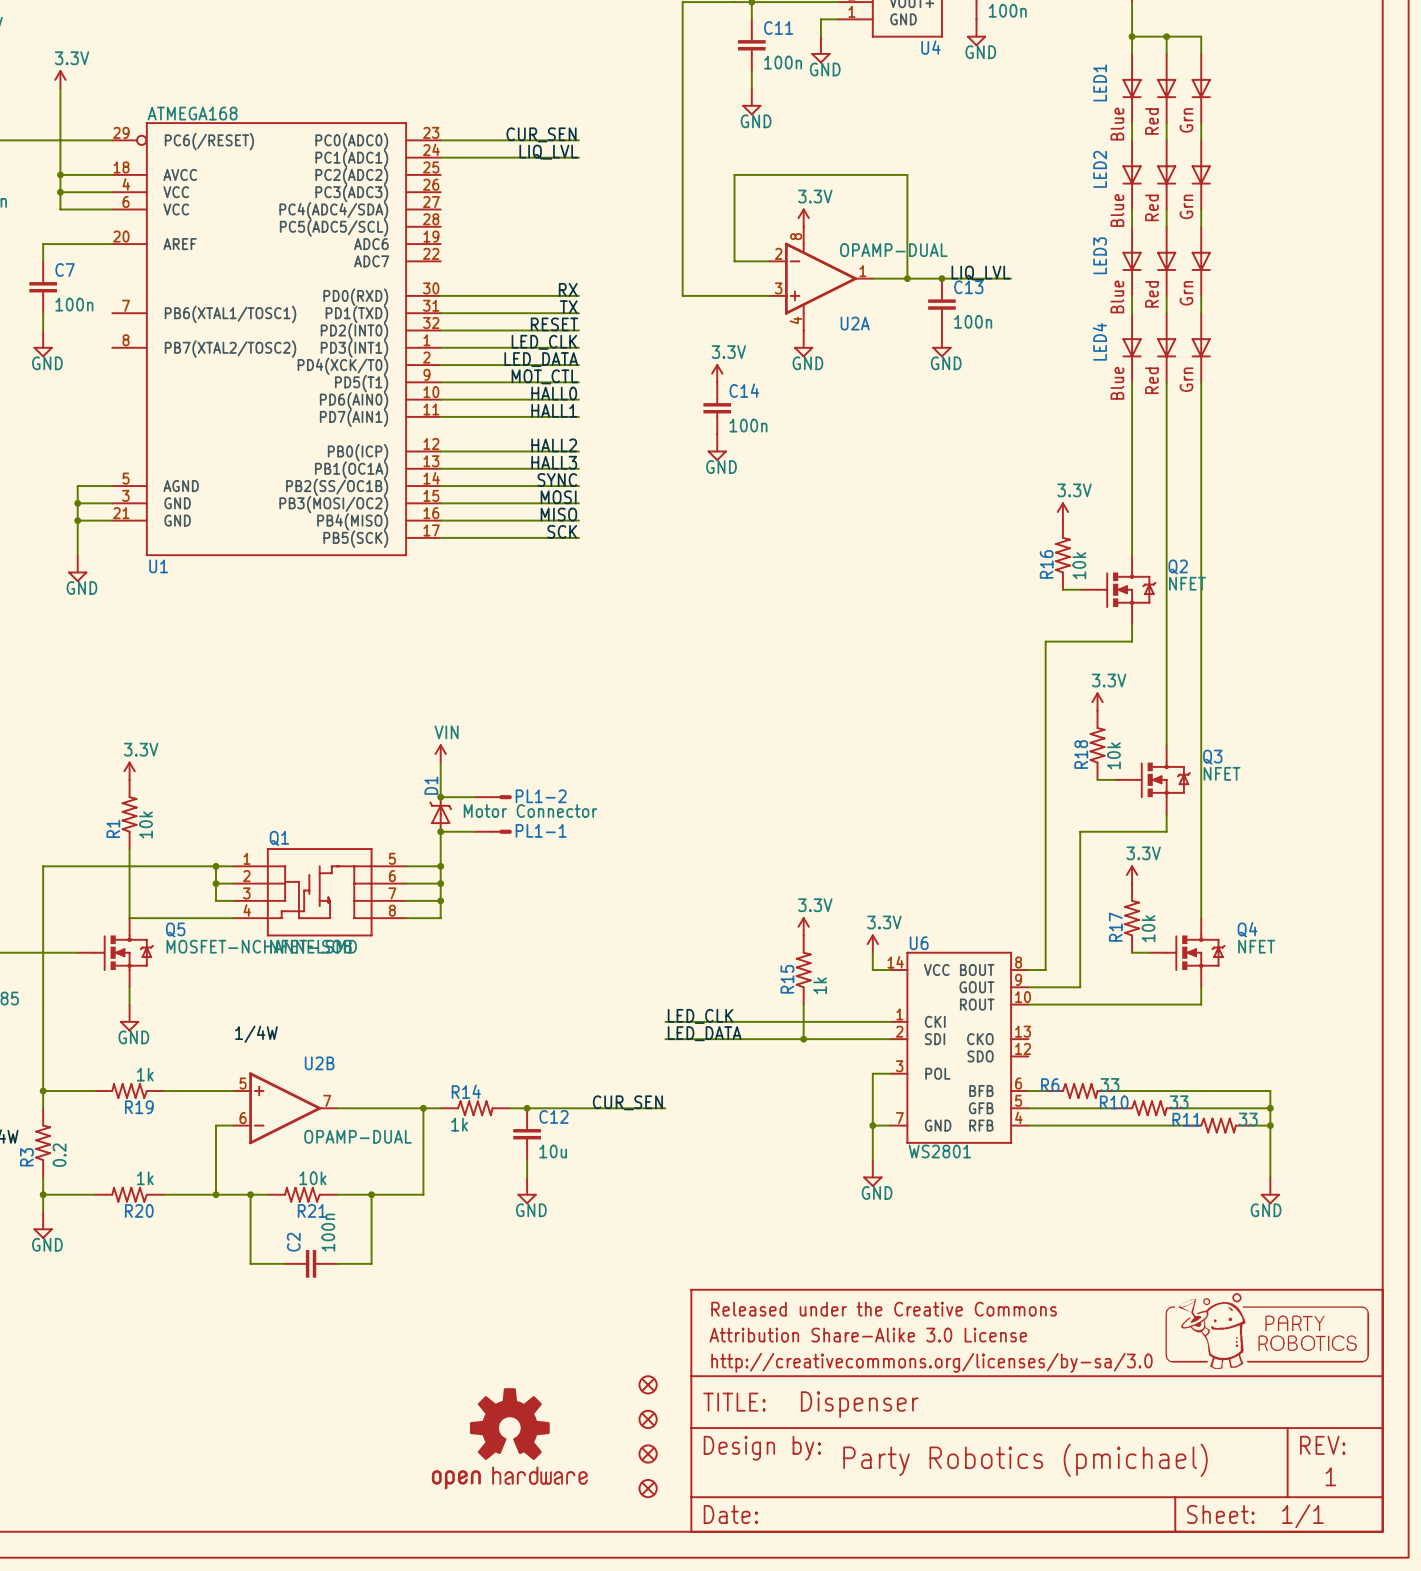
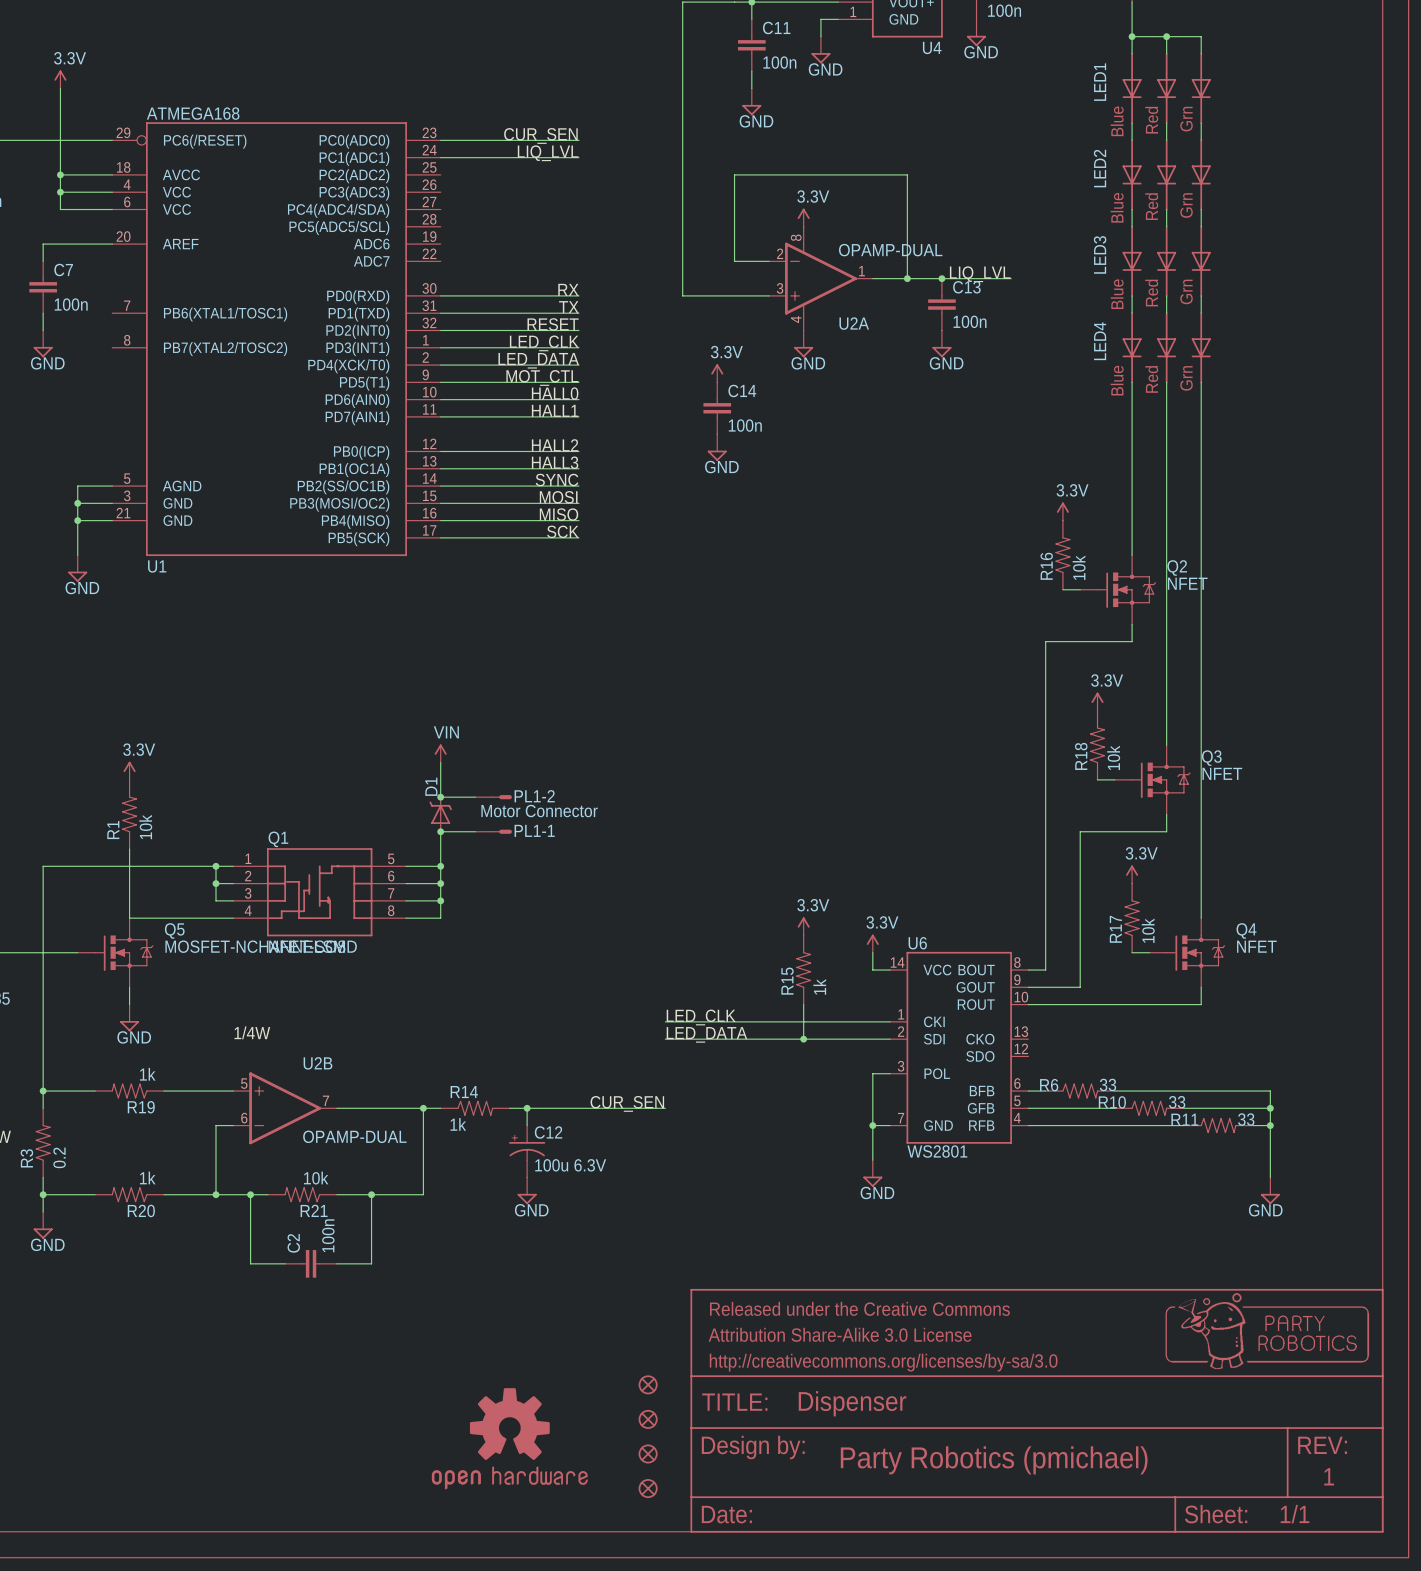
C12 symbol: [513, 1108, 541, 1161] -> [508, 1125, 546, 1178]
C12 value: 10u (553, 1151) -> 100u 6.3V (570, 1165)

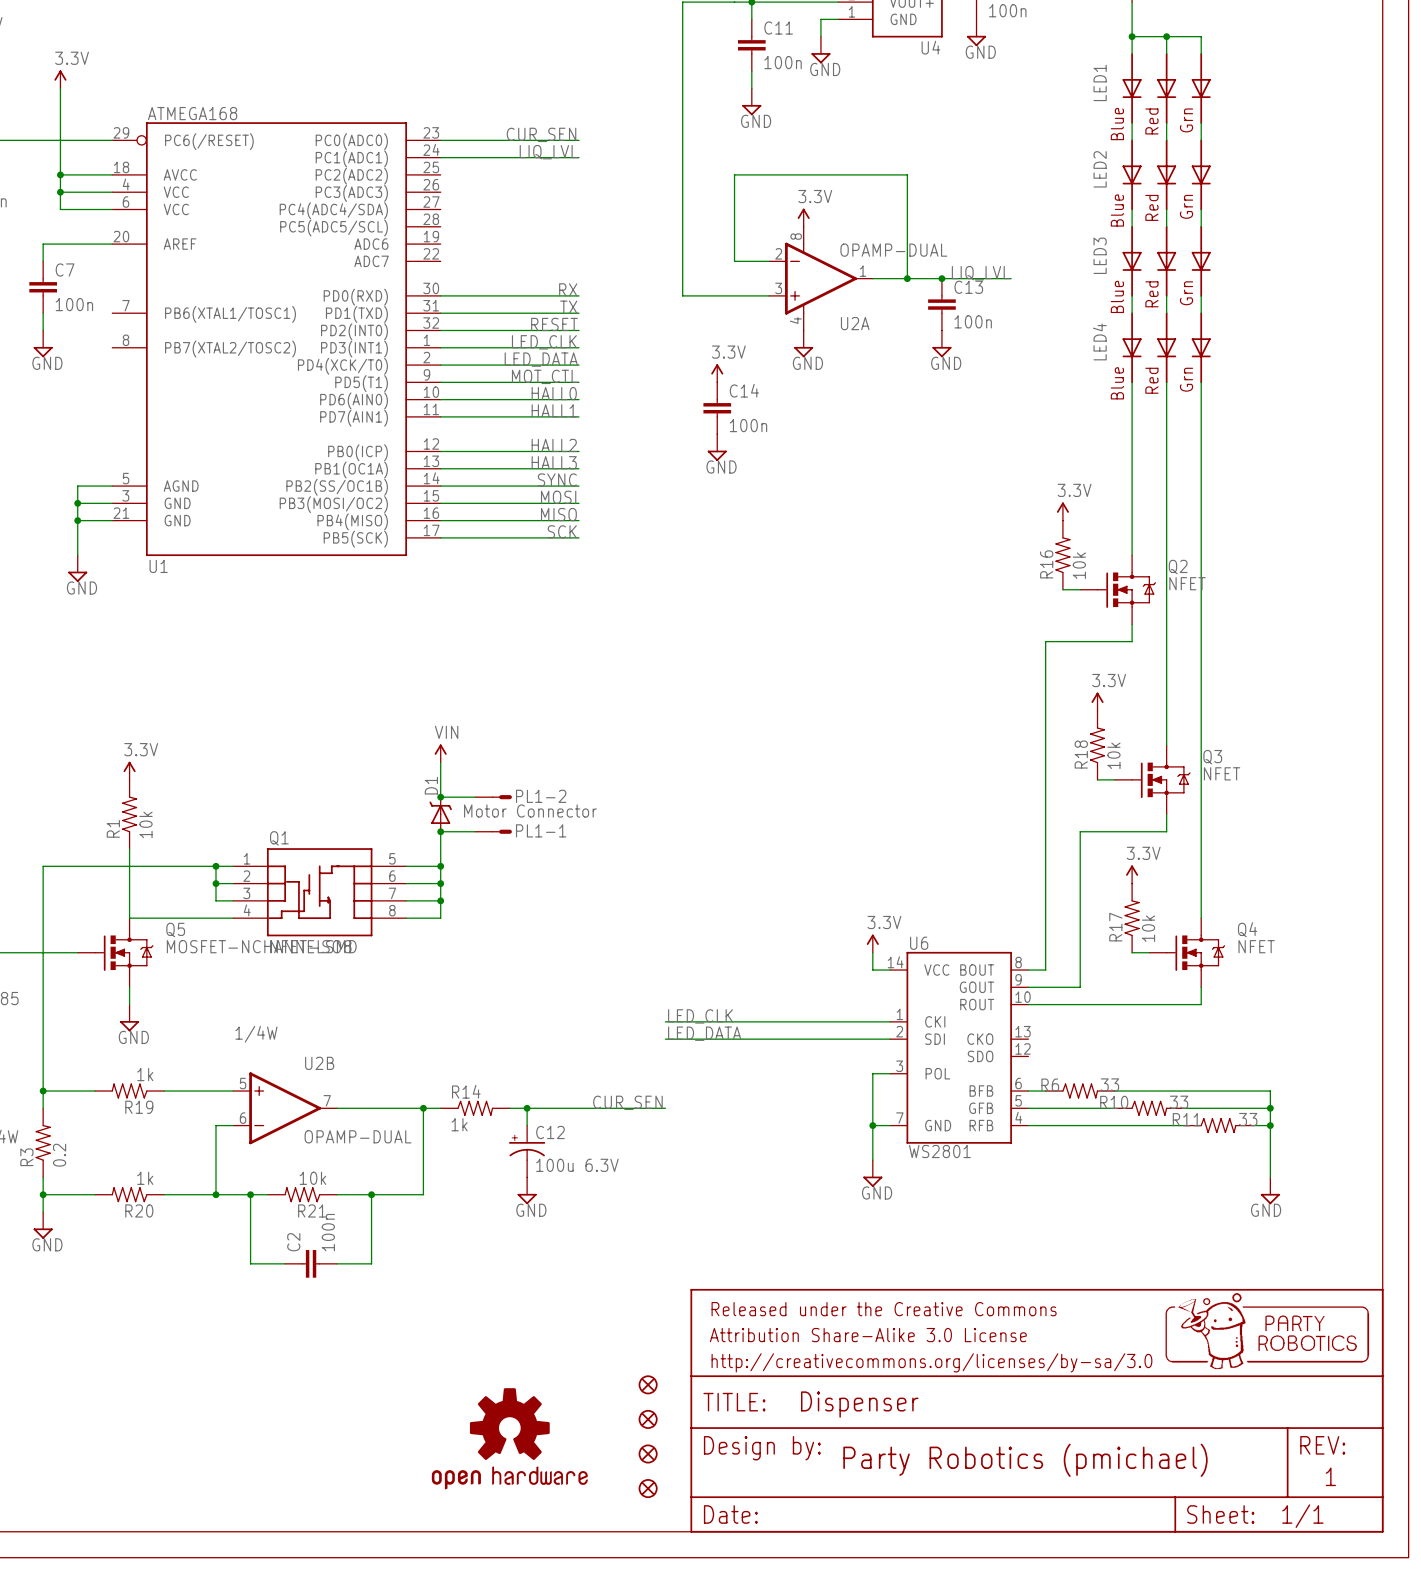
power symbol: 3.3V (803, 926) -> none
R15: 1k (803, 970) -> none
wire: (803, 1004) (803, 1039) -> none
junction: (803, 1039) -> none

